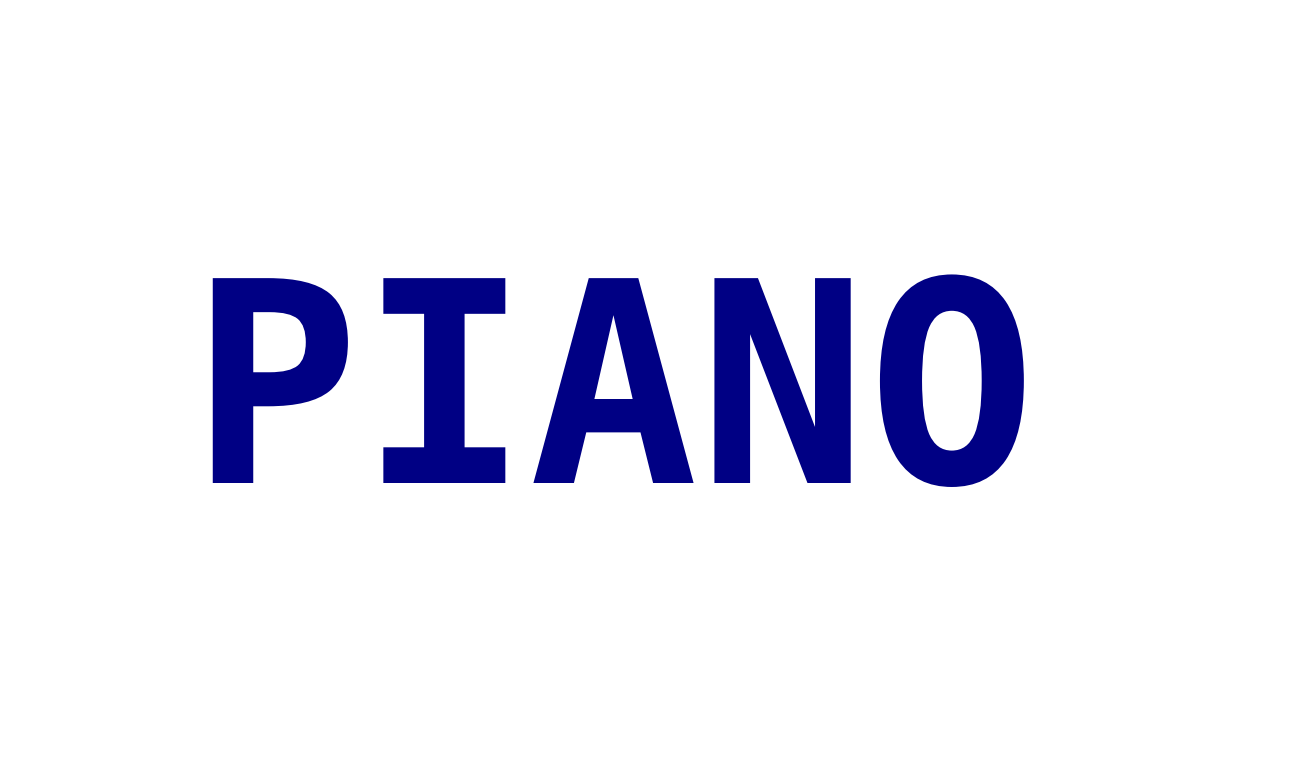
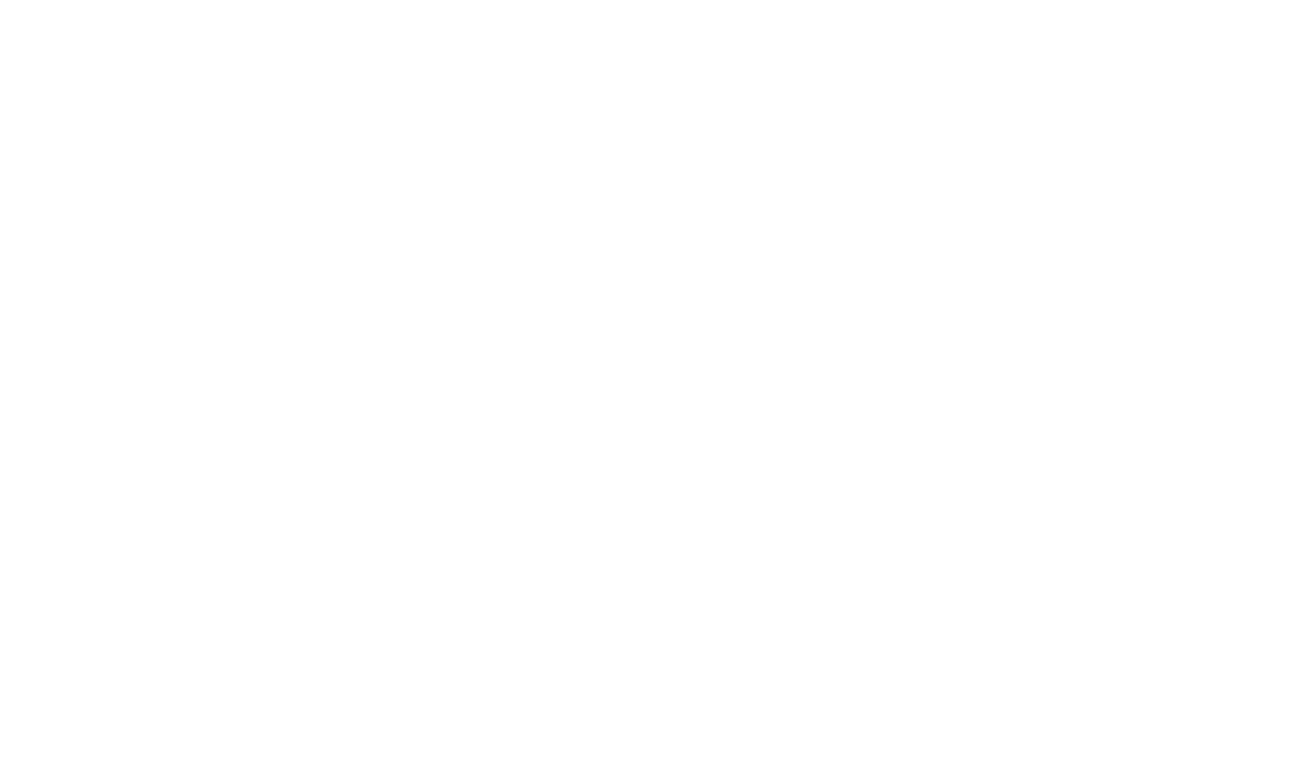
text: PIANO (618, 380) -> none

